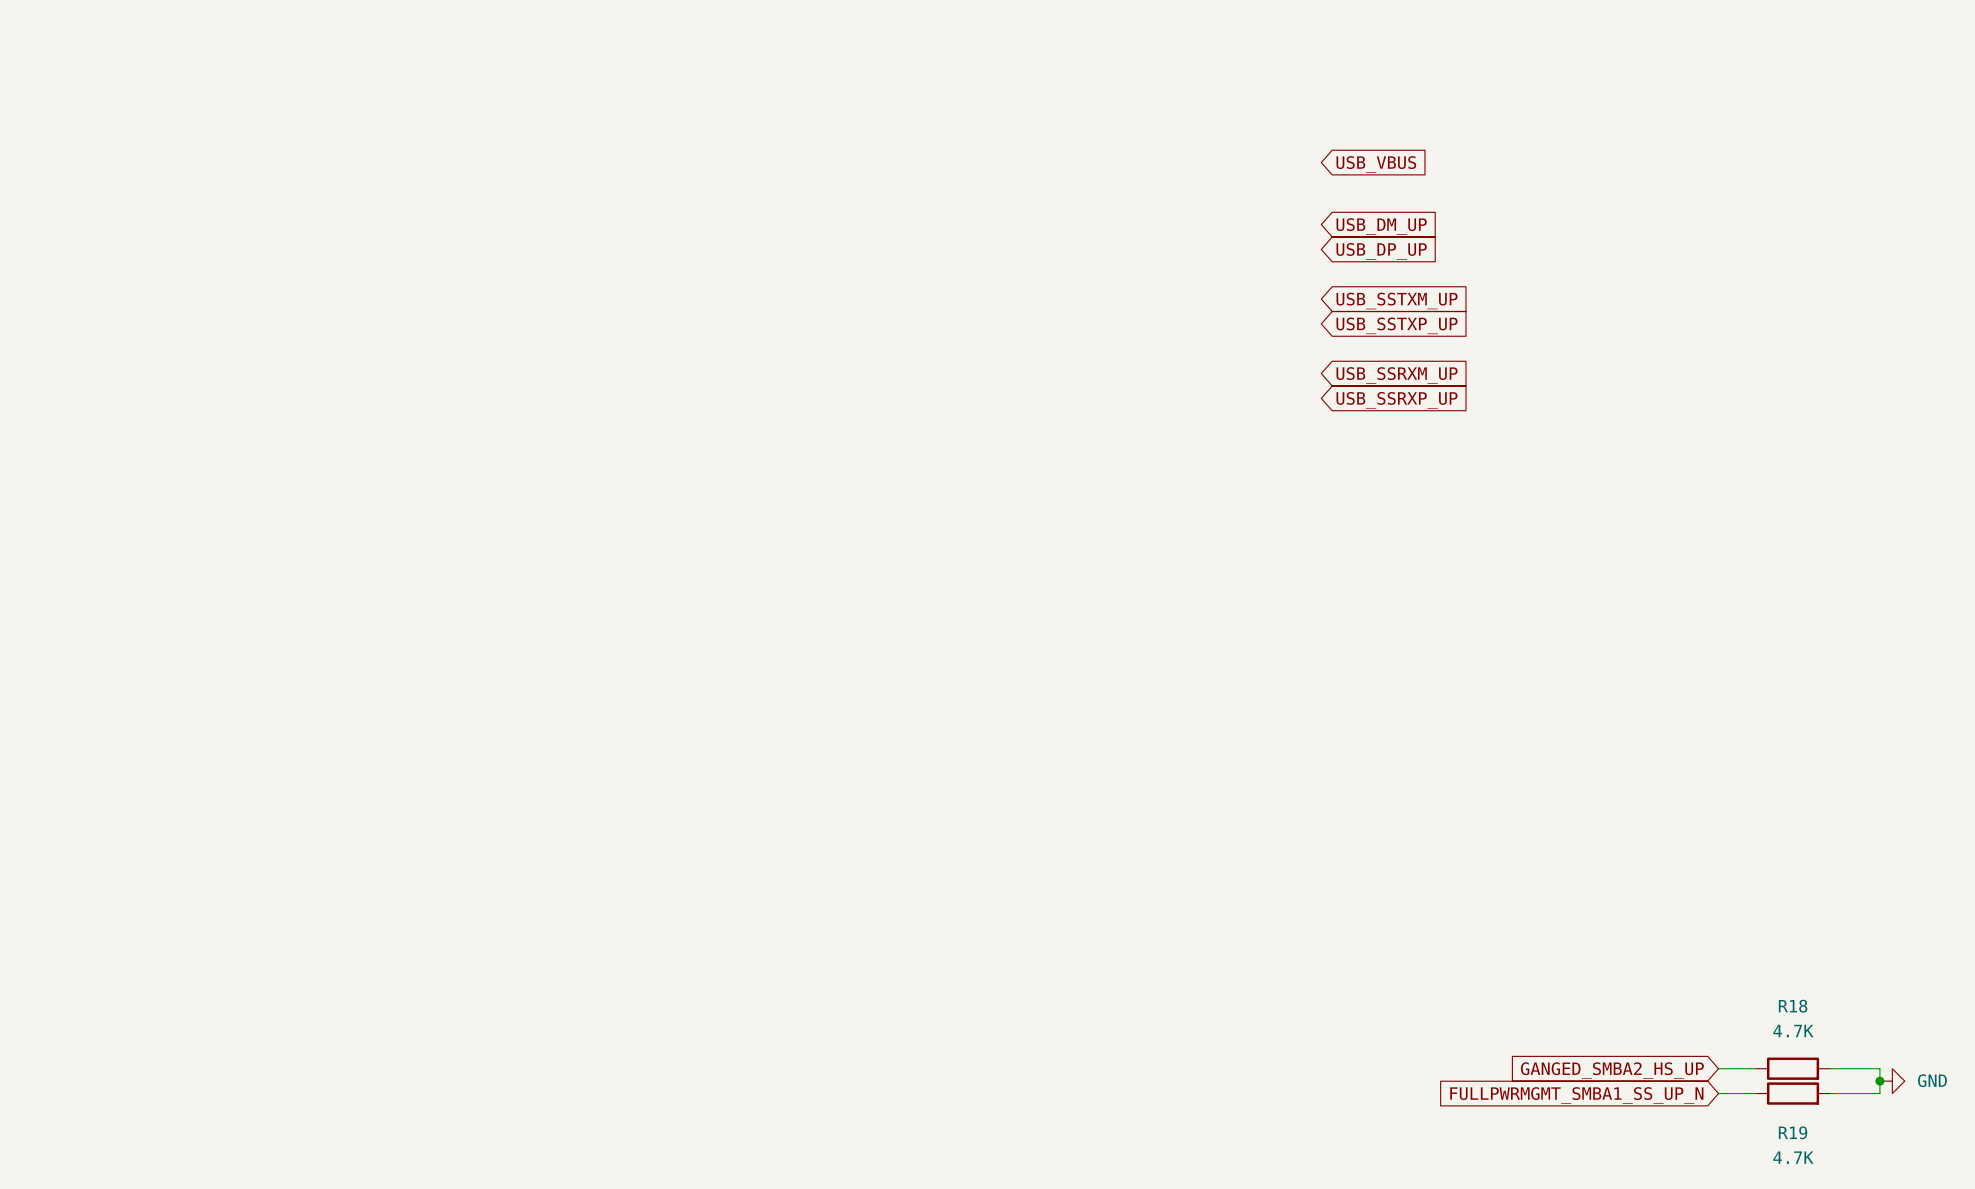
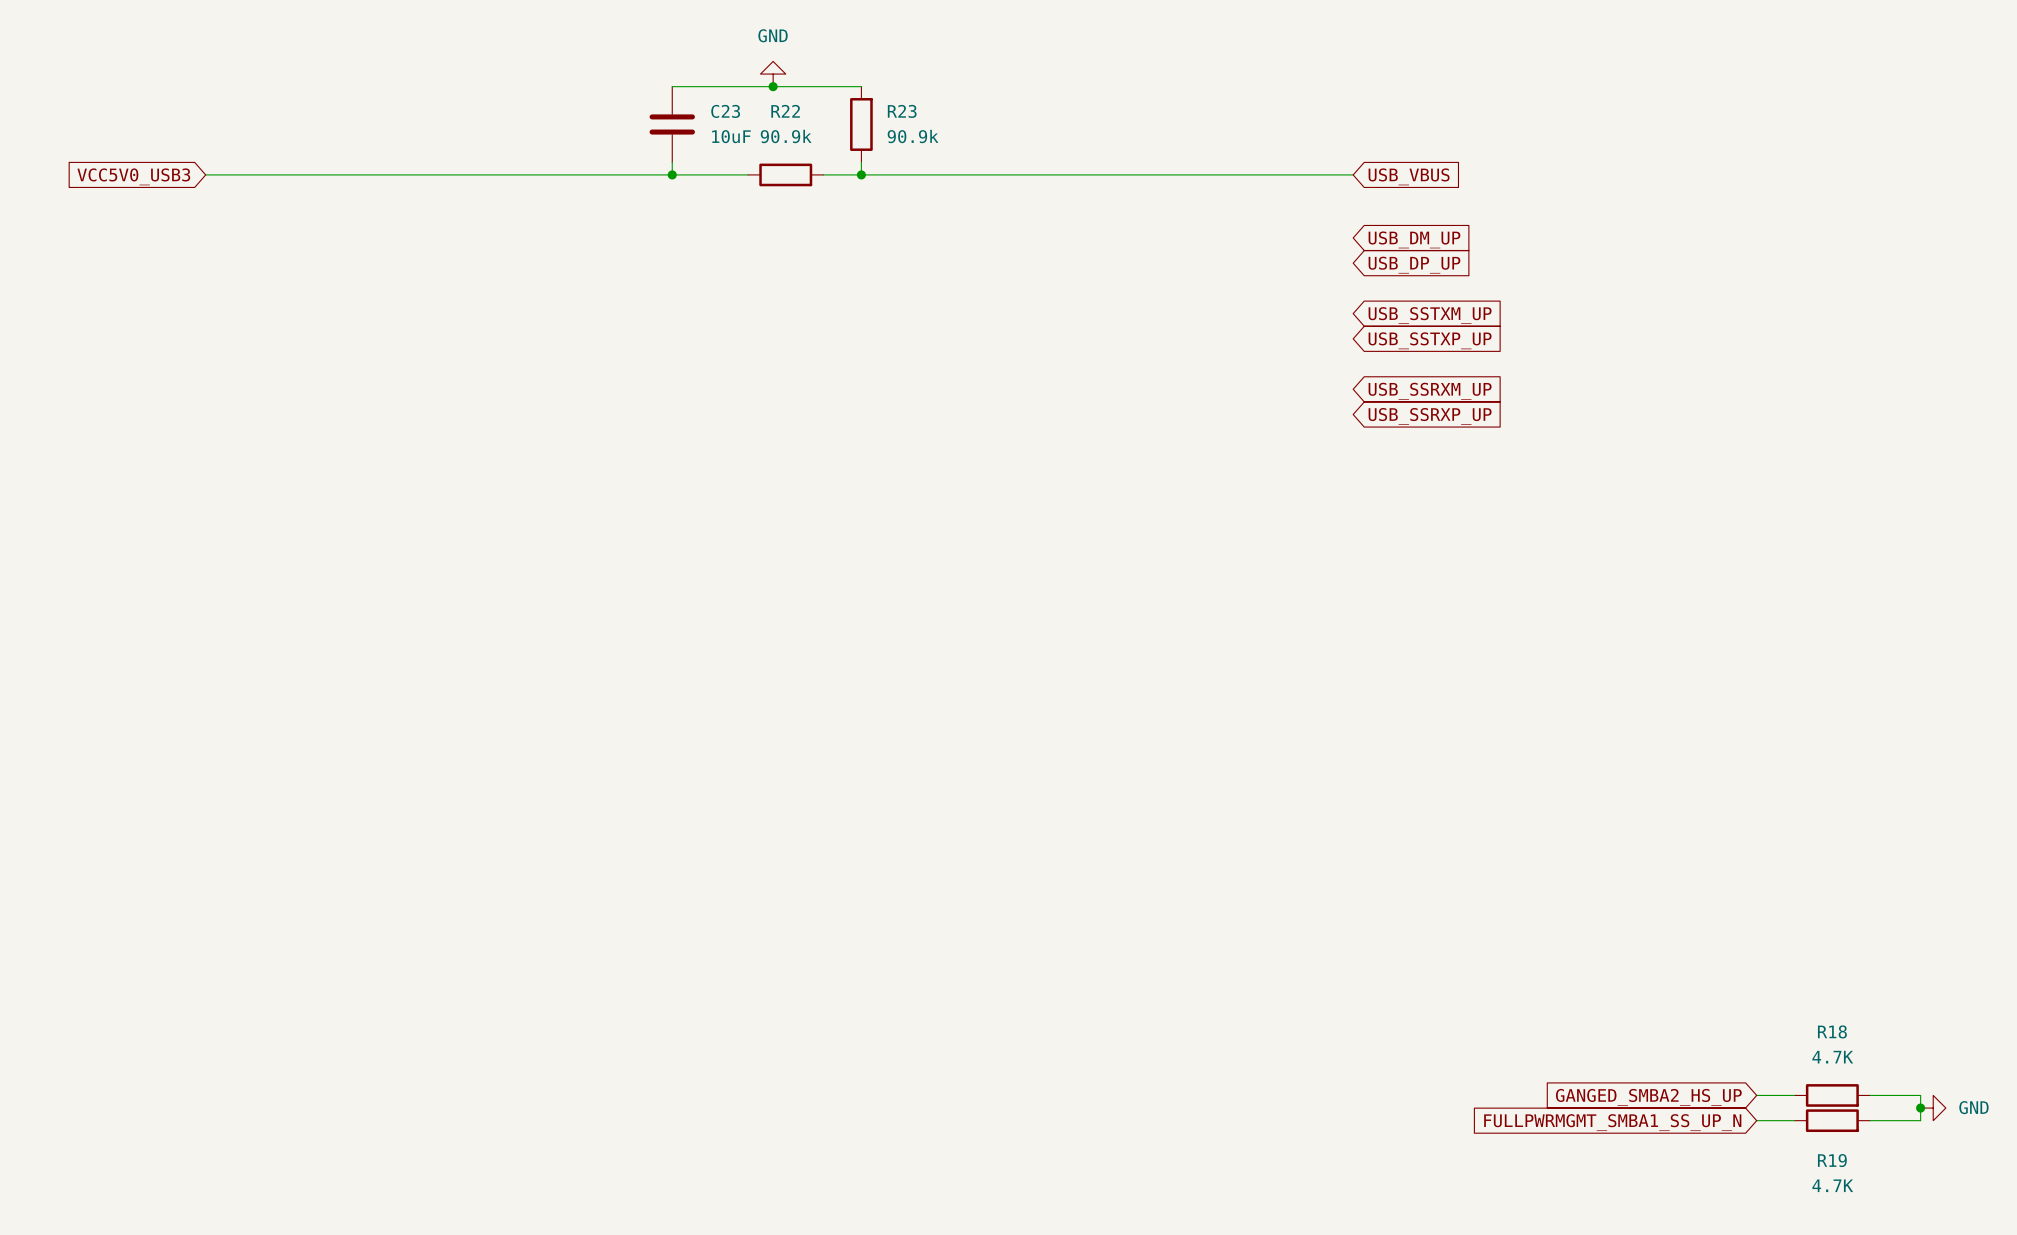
power symbol: none -> GND (773, 74)
wire: none -> (672, 86) (861, 86)
junction: none -> (773, 86)
C23: none -> 10uF (672, 124)
R23: none -> 90.9k (861, 124)
wire: none -> (672, 162) (672, 174)
wire: none -> (861, 162) (861, 174)
wire: none -> (205, 174) (747, 174)
junction: none -> (672, 174)
R22: none -> 90.9k (785, 174)
wire: none -> (823, 174) (1353, 174)
junction: none -> (861, 174)
global label: none -> VCC5V0_USB3 (133, 176)

